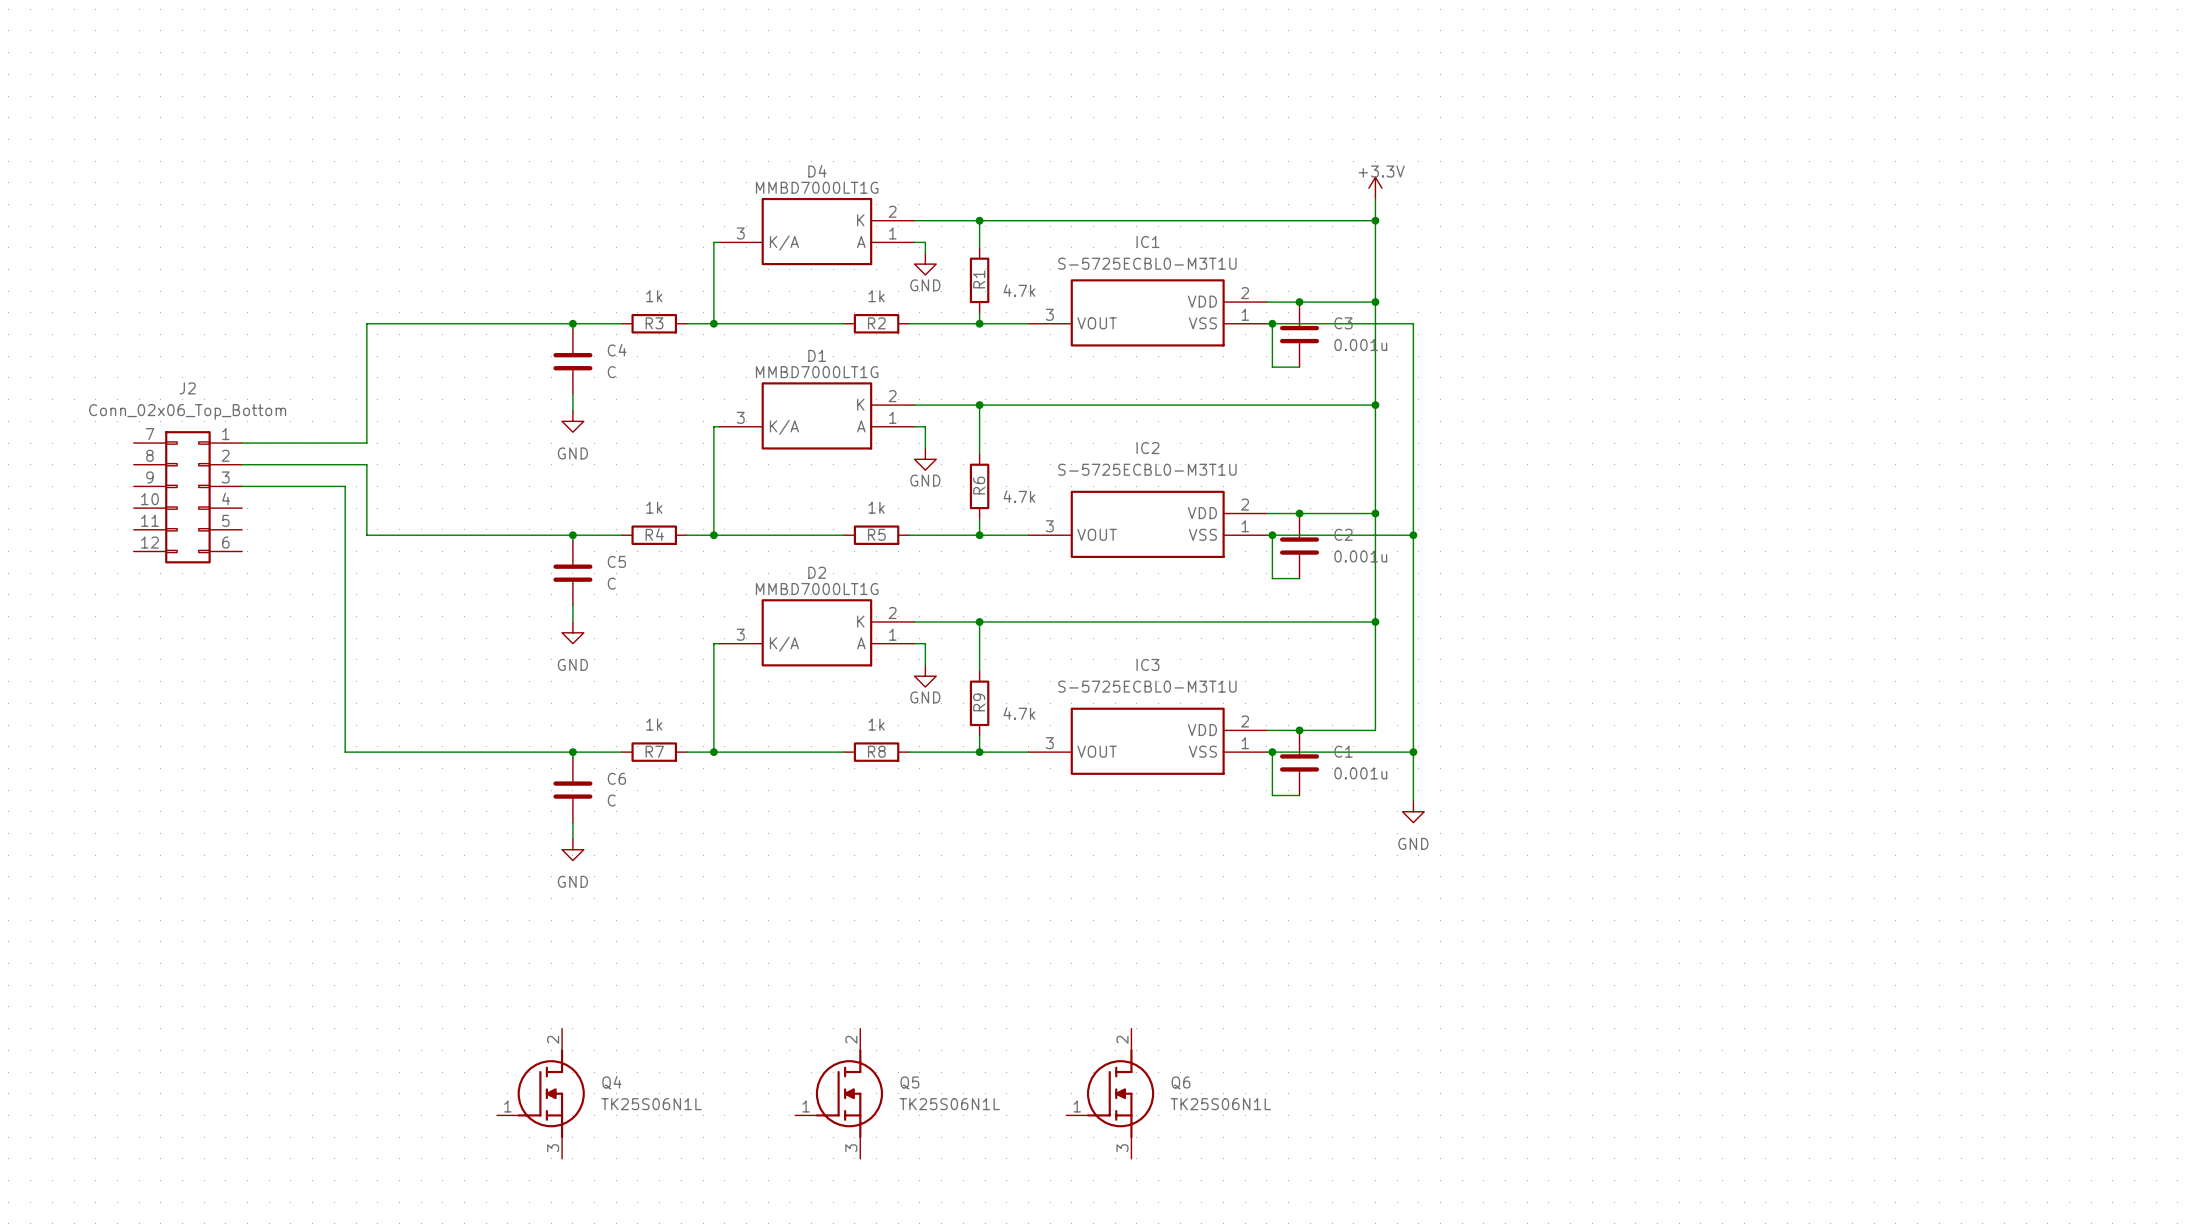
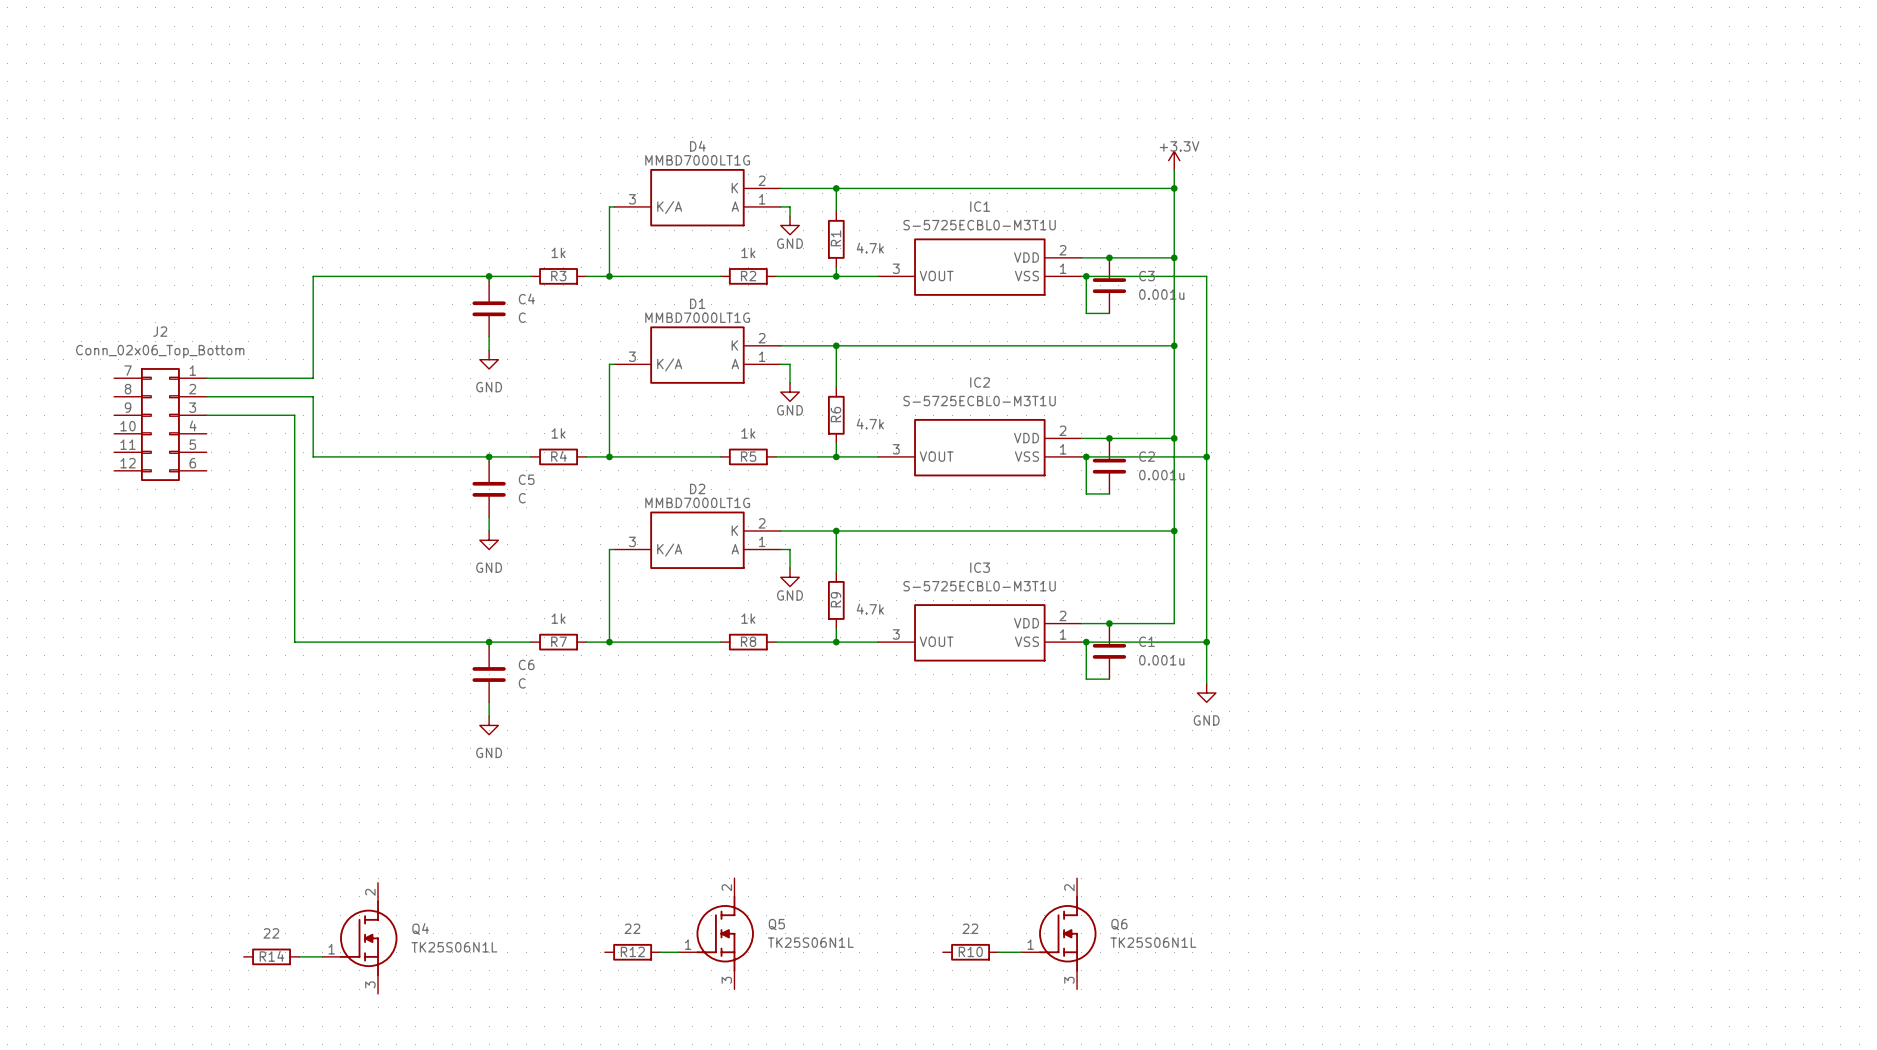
Q4 position: (540, 1093) -> (359, 938)
Q6 position: (1110, 1093) -> (1058, 933)
R12: none -> 22 (632, 952)
wire: none -> (660, 952) (678, 952)
R10: none -> 22 (970, 952)
wire: none -> (998, 952) (1021, 952)
R14: none -> 22 (271, 956)
wire: none -> (299, 956) (322, 956)

